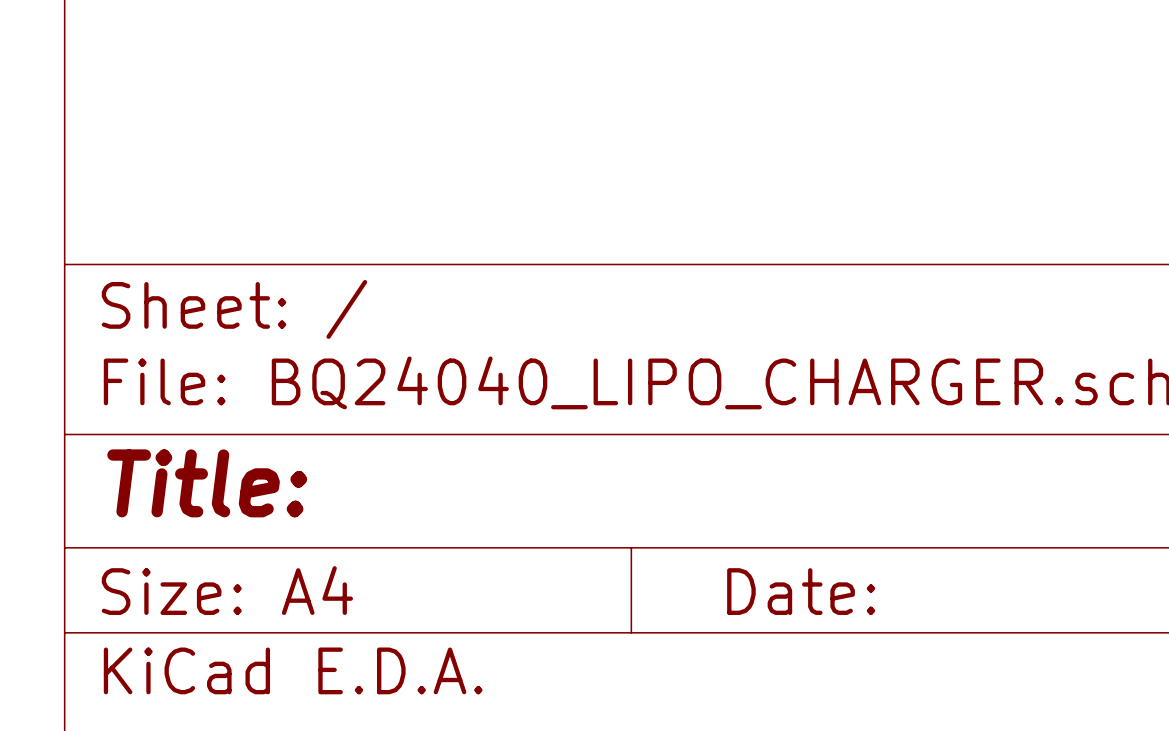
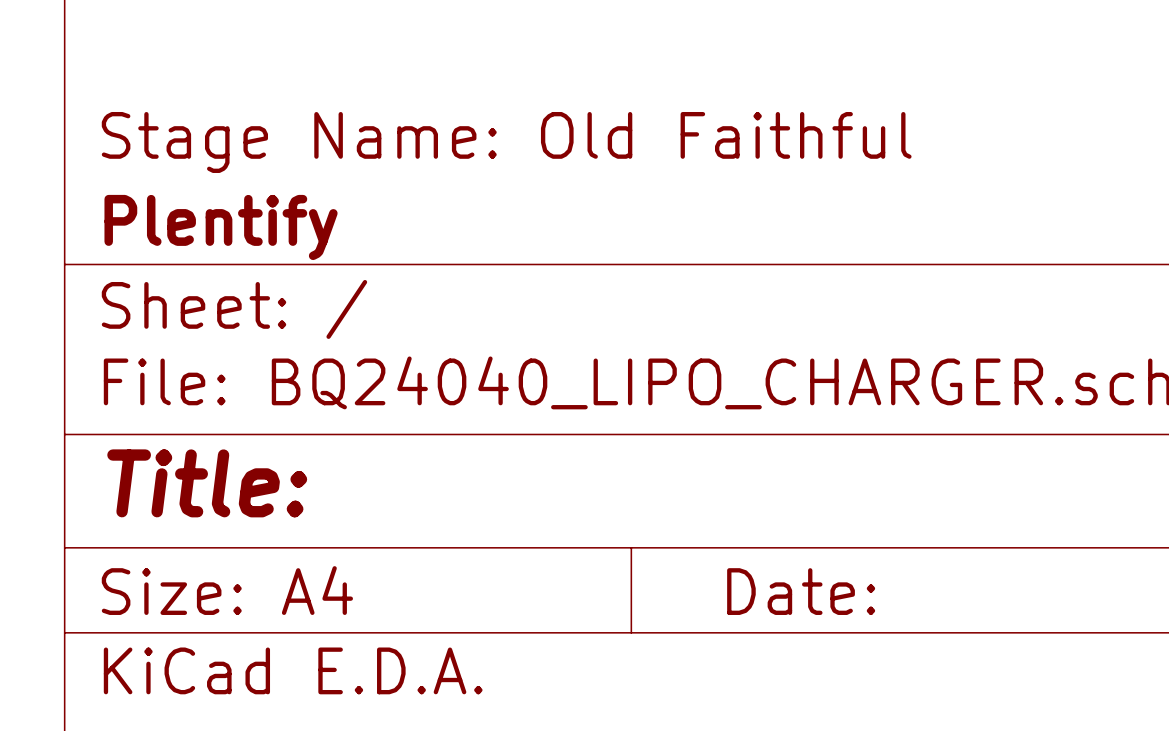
title block: none -> Stage Name: Old Faithful (506, 142)
title block: none -> Plentify (221, 227)

